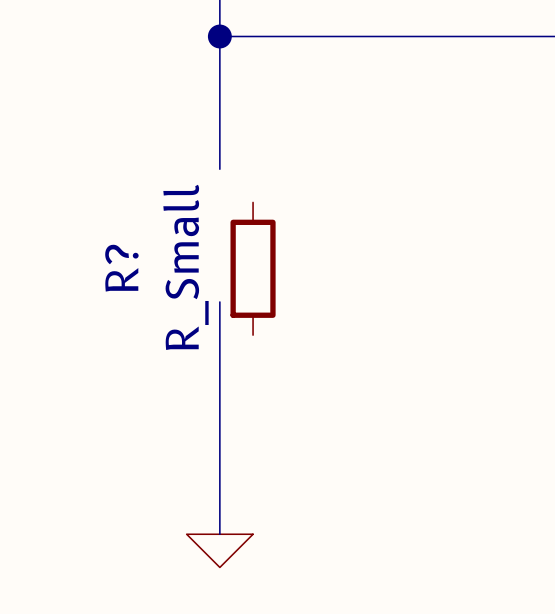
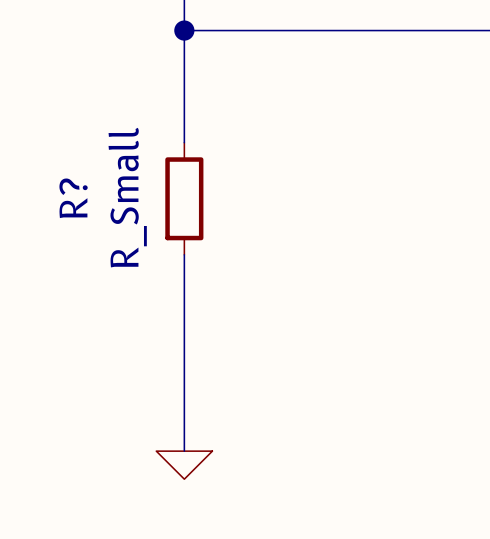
R? position: (253, 268) -> (184, 198)

